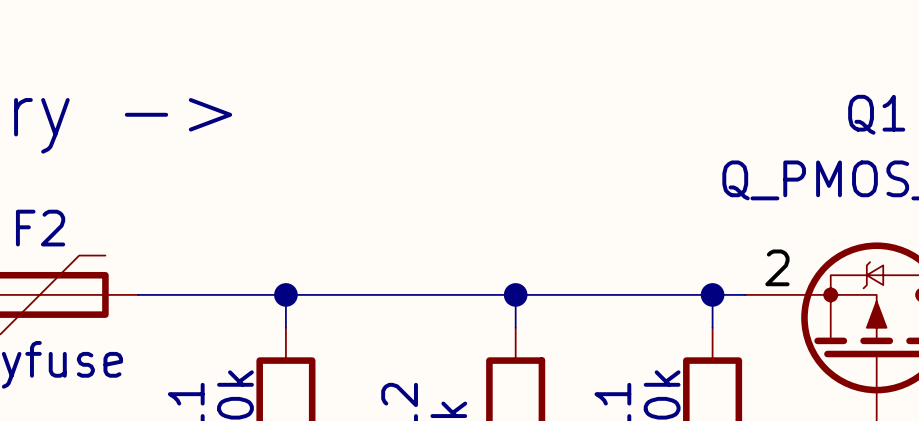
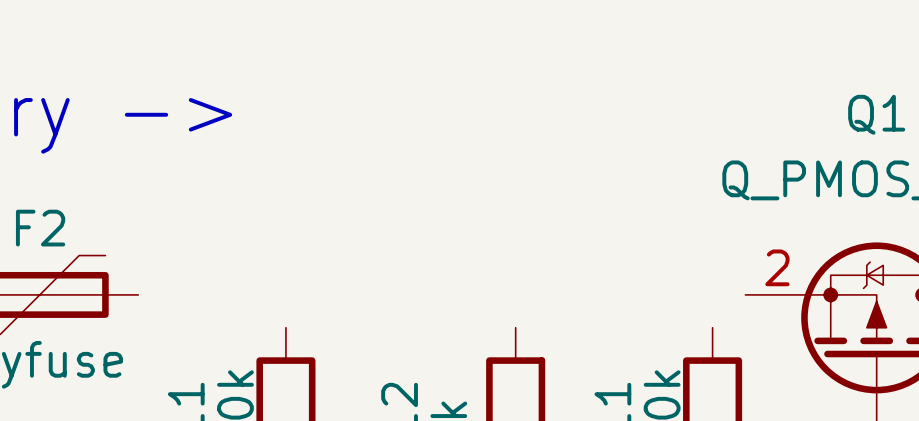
wire: (138, 294) (745, 294) -> none
wire: (285, 294) (285, 327) -> none
junction: (285, 294) -> none
wire: (515, 294) (515, 327) -> none
junction: (515, 294) -> none
wire: (712, 294) (712, 327) -> none
junction: (712, 294) -> none

